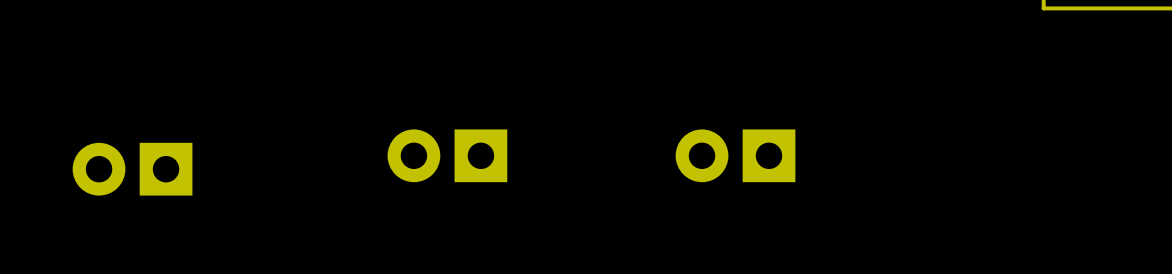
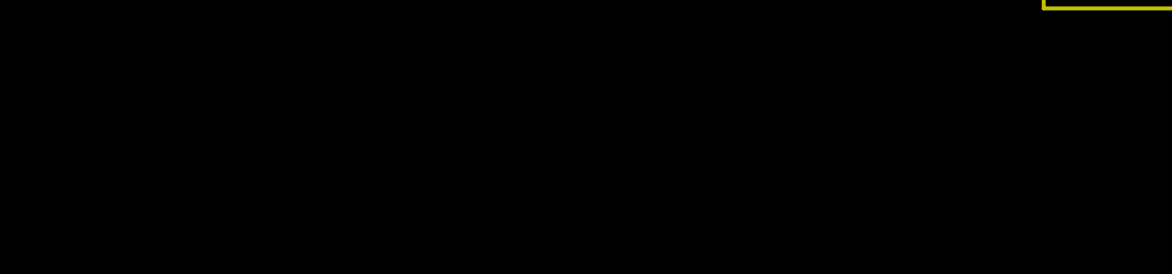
part: (447, 155) -> none
part: (735, 155) -> none
part: (132, 169) -> none

